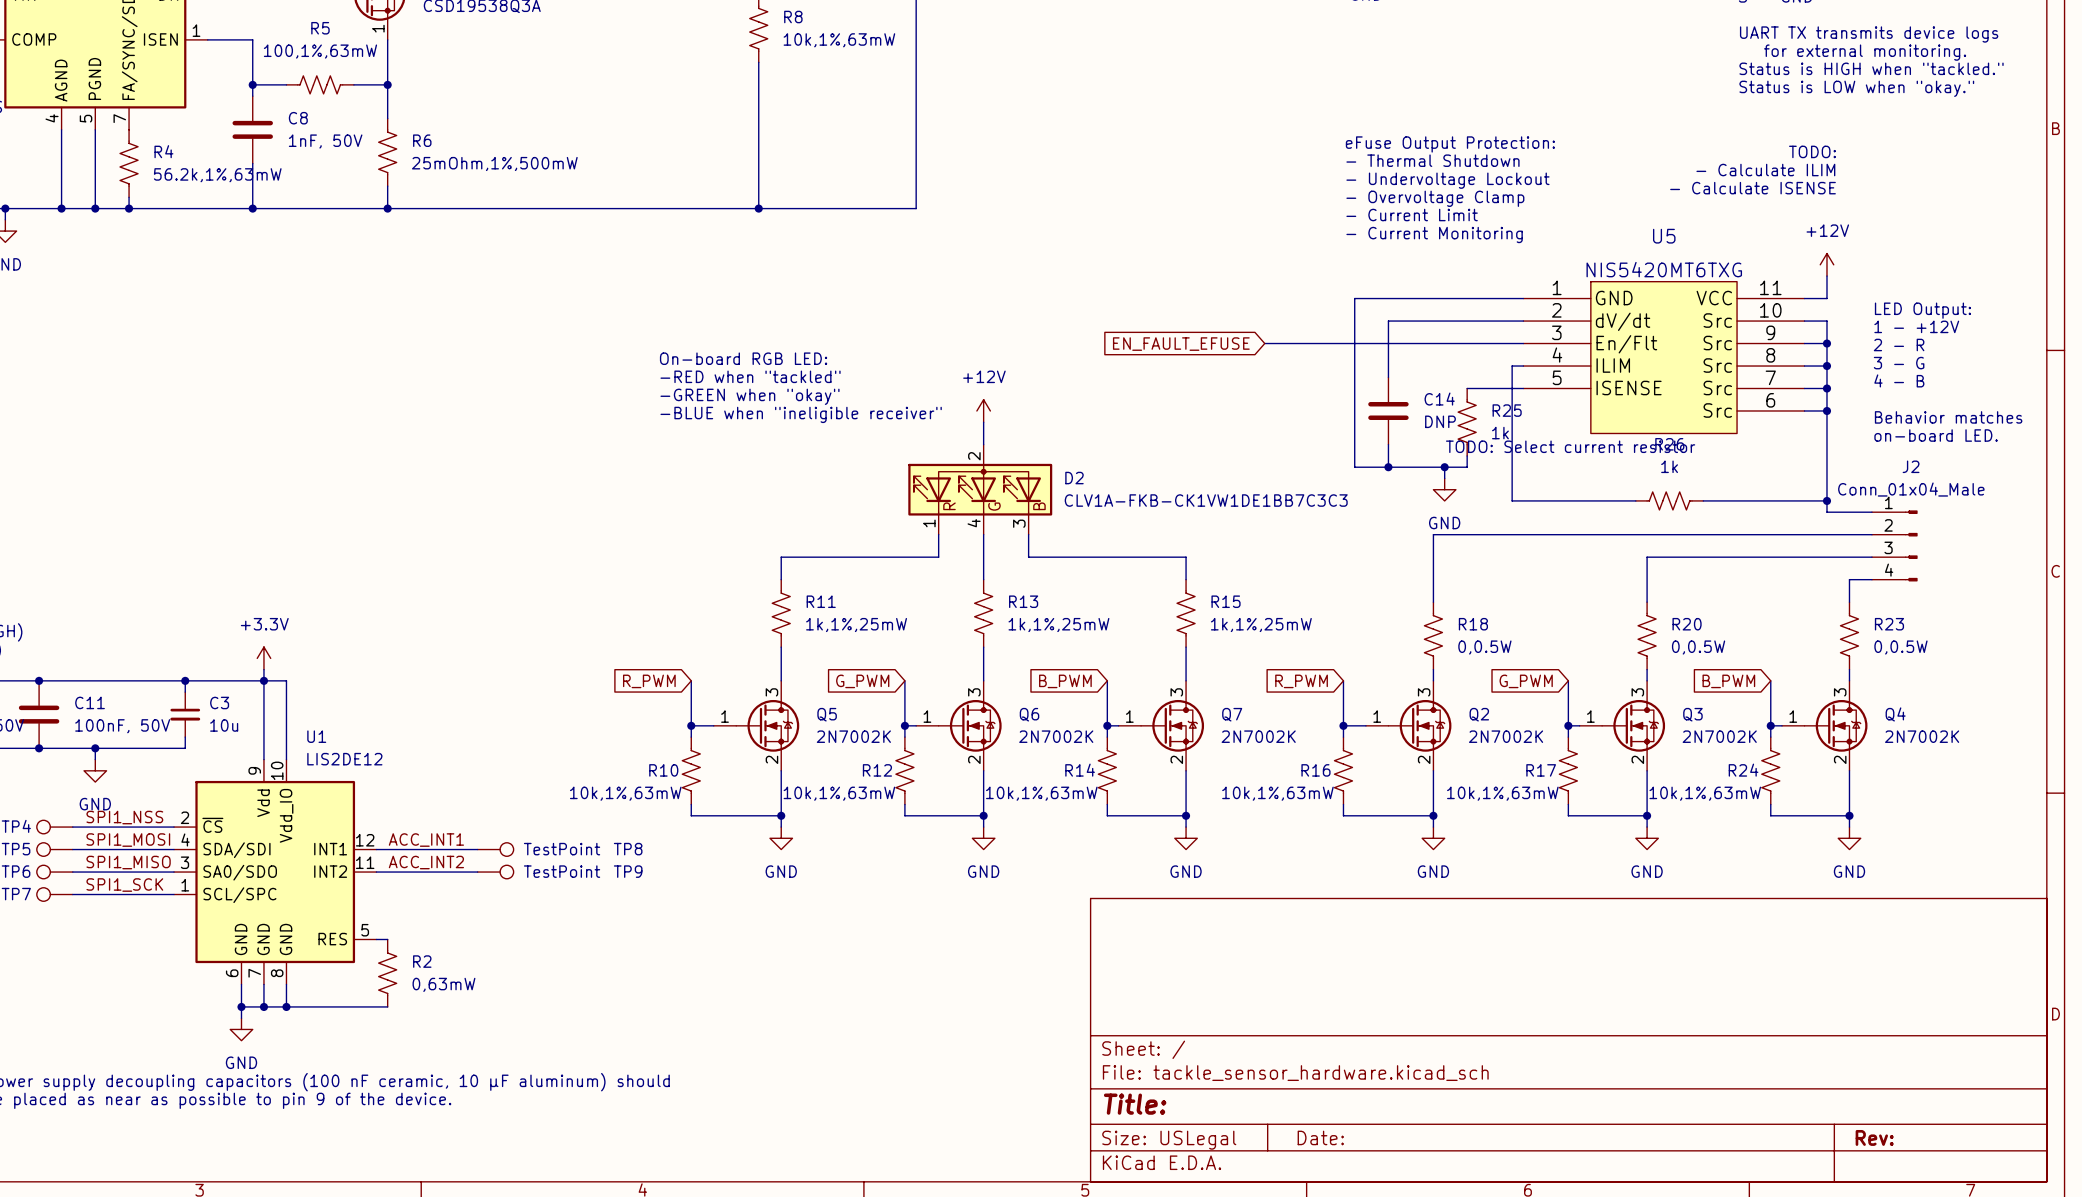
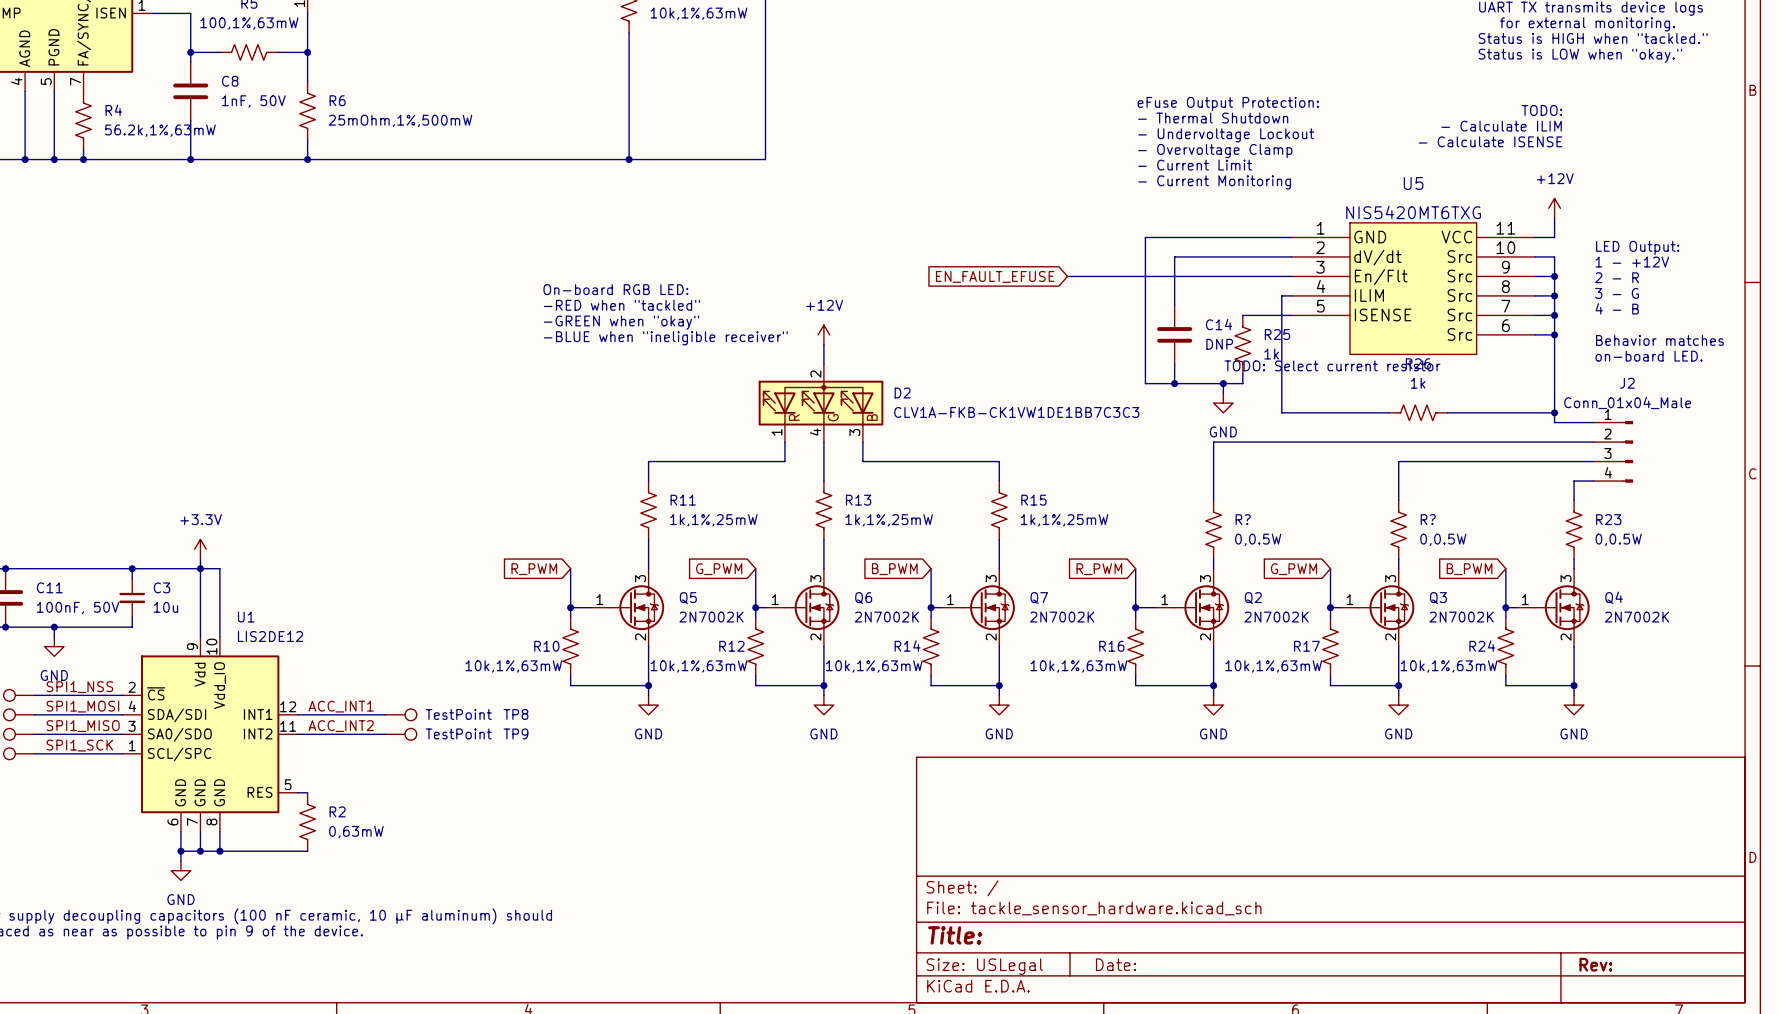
R18 name: R18 (1473, 624) -> R? (1243, 519)
R20 name: R20 (1687, 624) -> R? (1428, 519)

